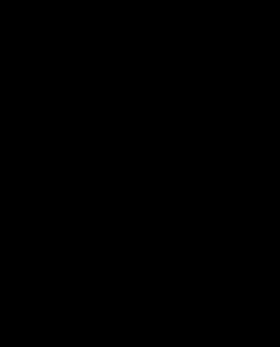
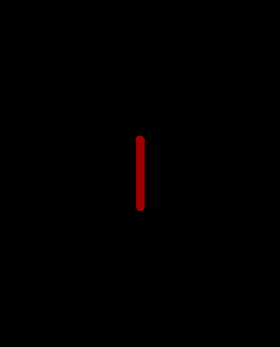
track: none -> (139, 139) (140, 207)

